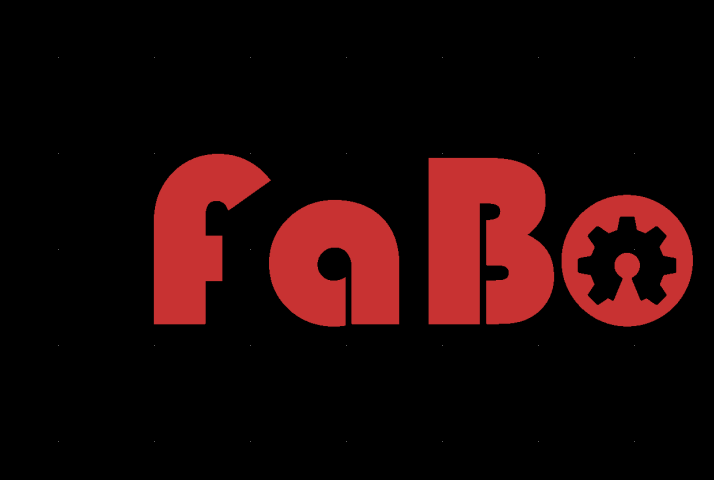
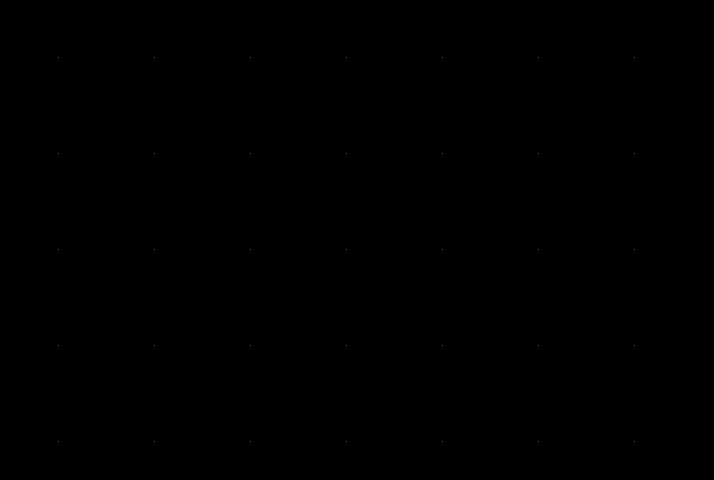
part: (423, 240) -> none

